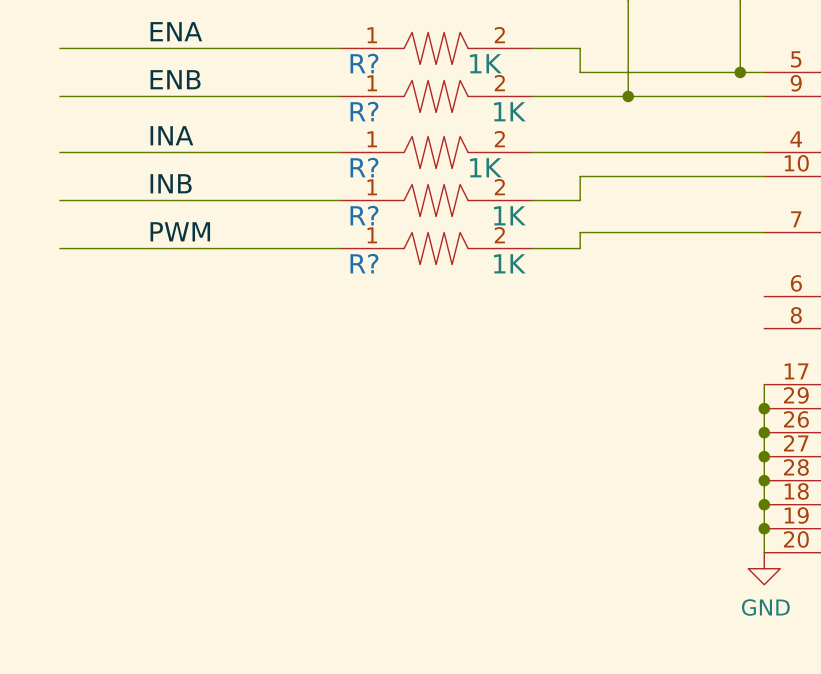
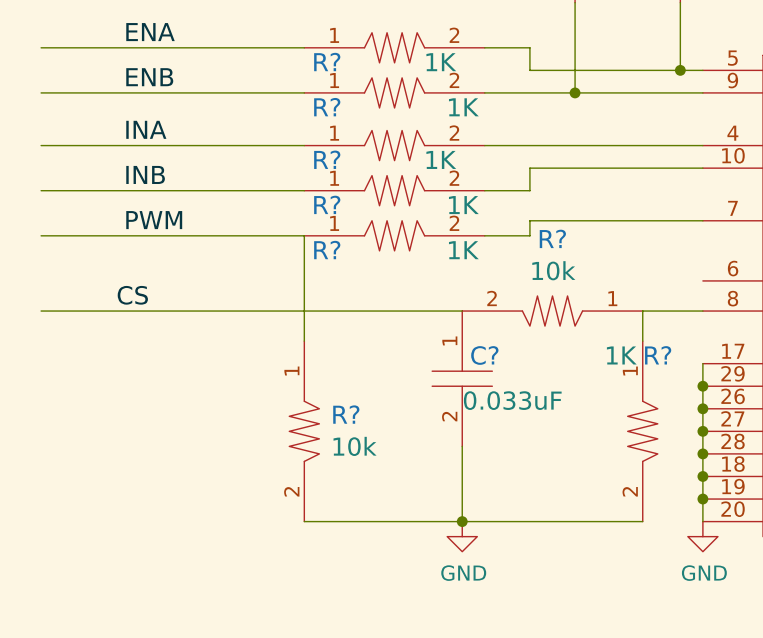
wire: none -> (304, 235) (304, 341)
label: none -> CS (132, 295)
wire: none -> (41, 311) (462, 311)
R?: none -> (552, 311)
wire: none -> (702, 311) (642, 311) (642, 341)
C?: none -> (462, 378)
R?: none -> (304, 431)
R?: none -> (642, 431)
wire: none -> (462, 446) (462, 521)
wire: none -> (304, 521) (642, 521)
junction: none -> (462, 521)
power symbol: none -> GND (462, 536)

